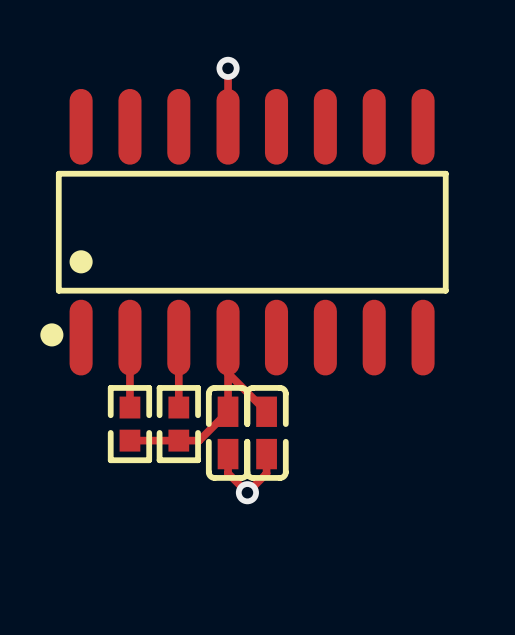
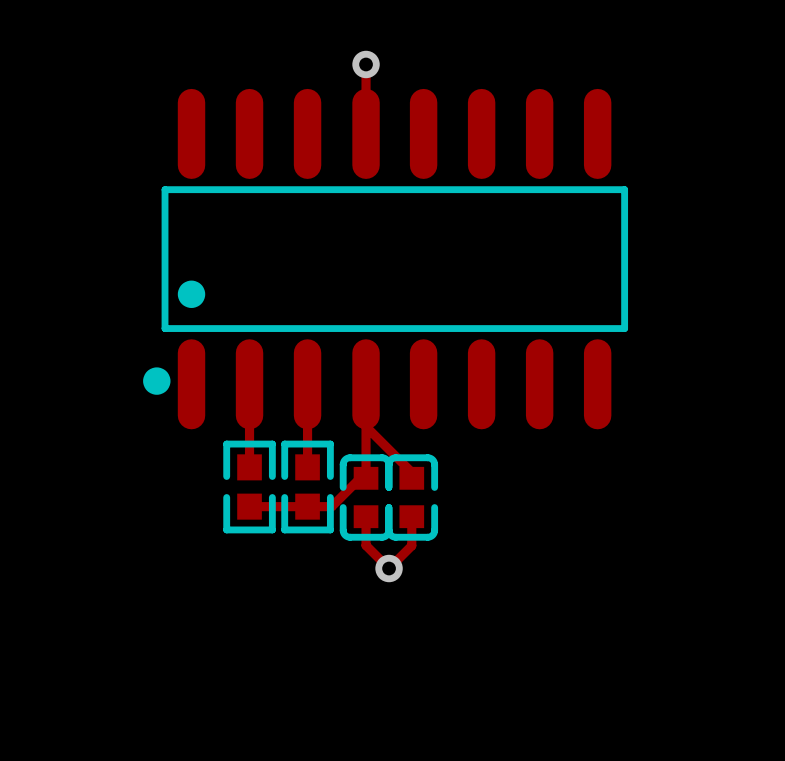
part footprint: [205, 385, 251, 481] -> [339, 454, 393, 541]
part footprint: [244, 385, 289, 481] -> [385, 454, 439, 541]

